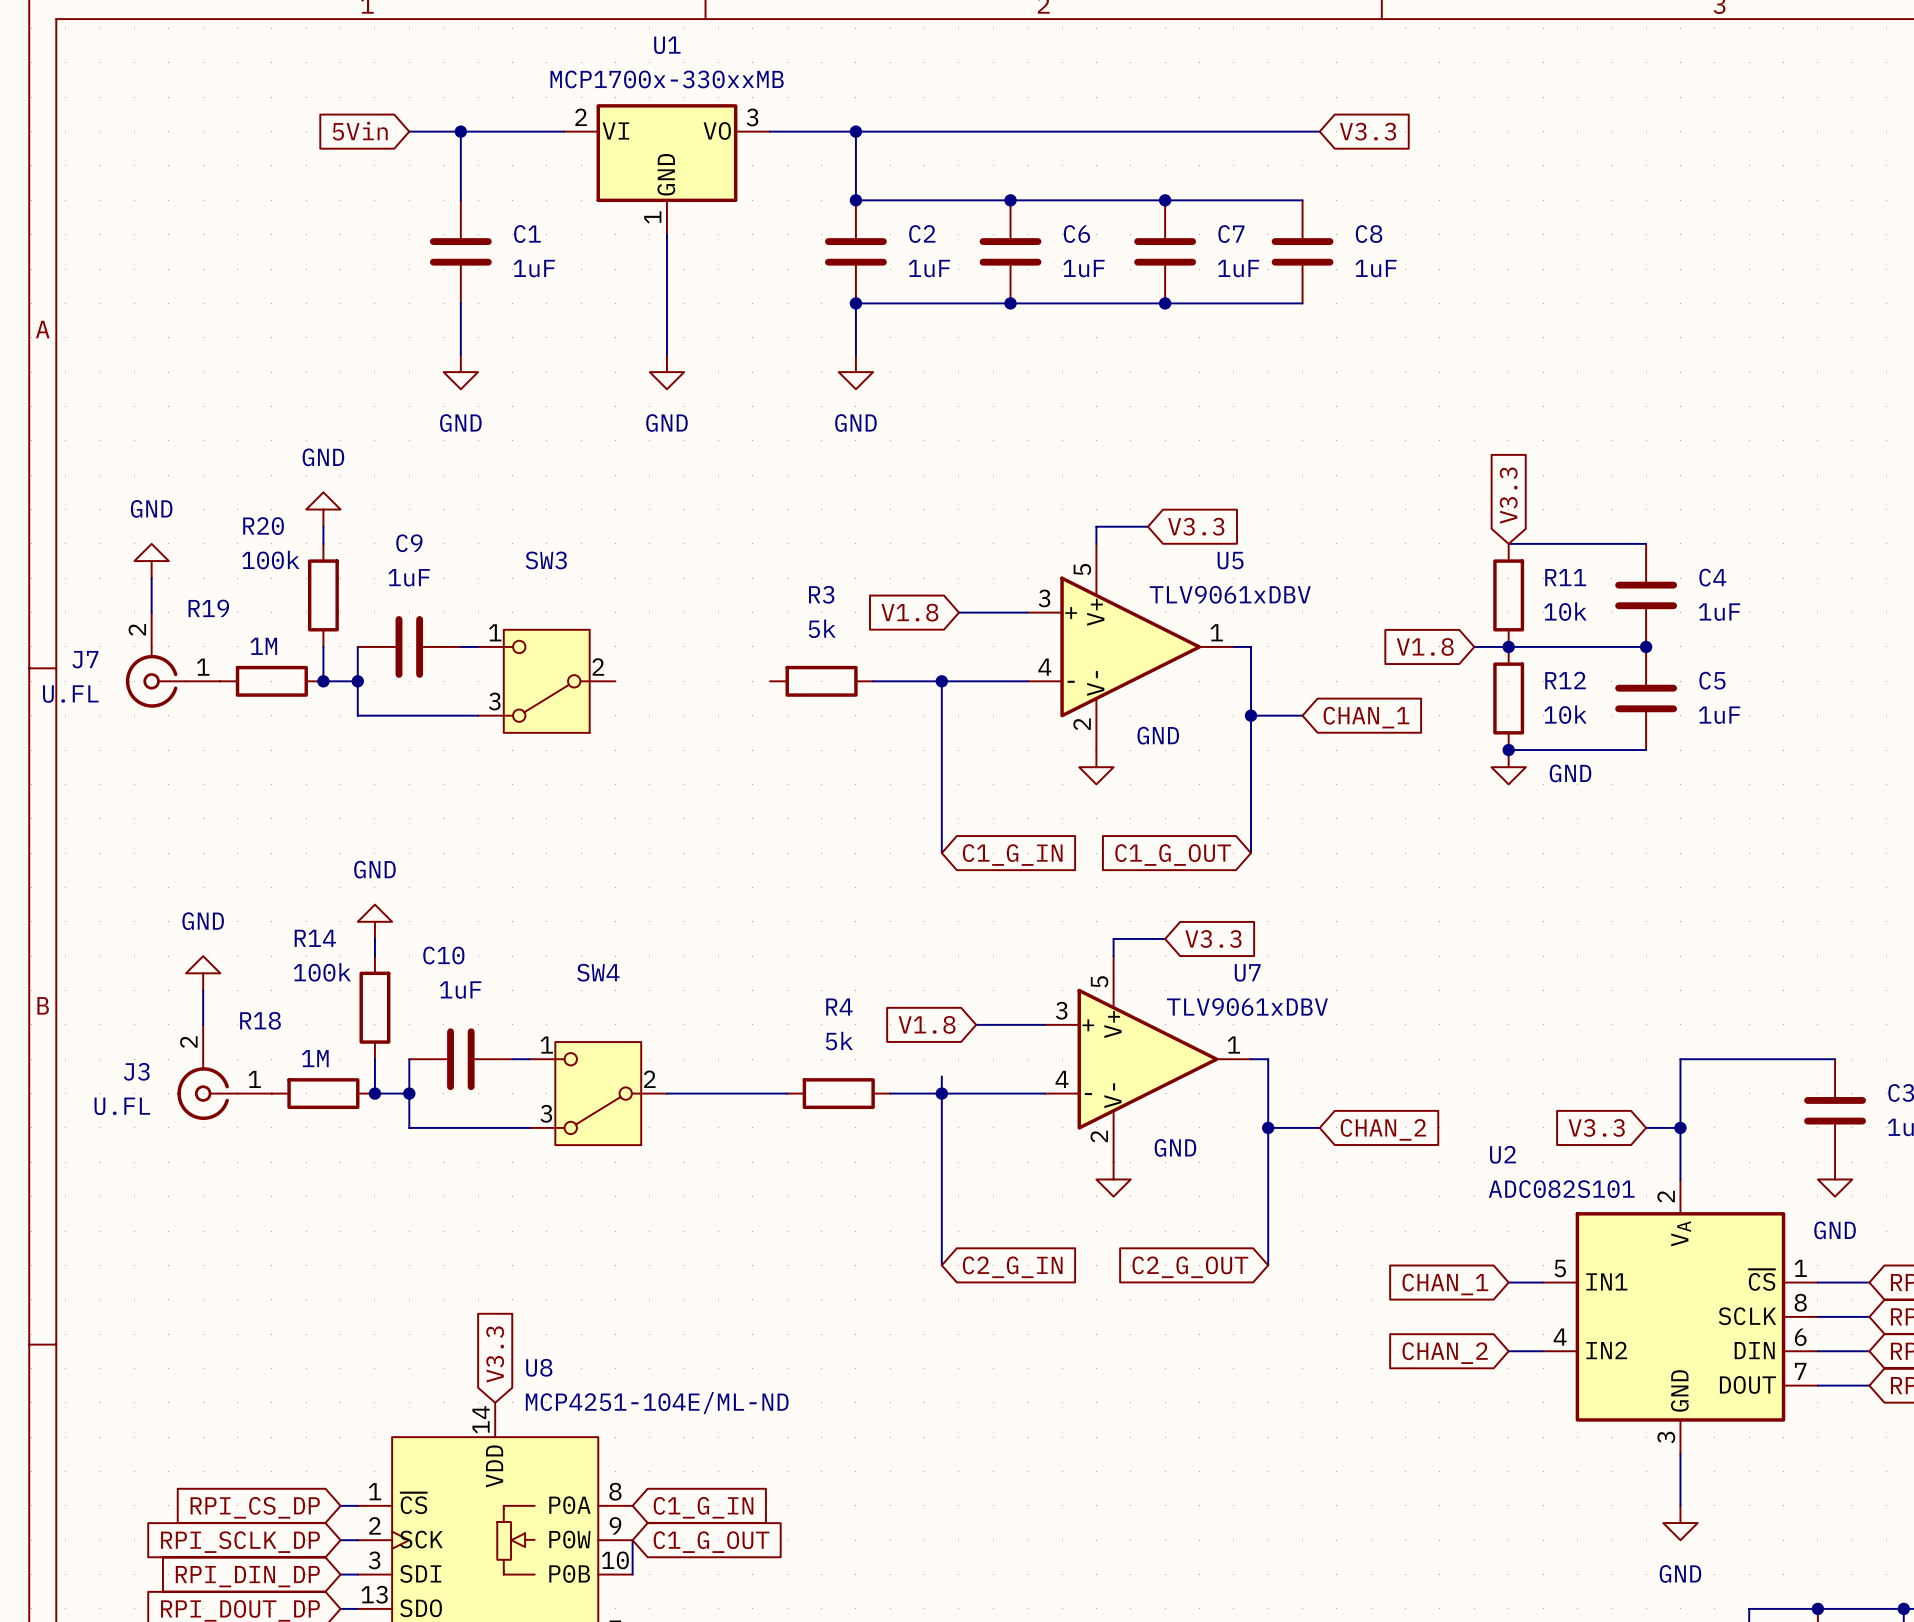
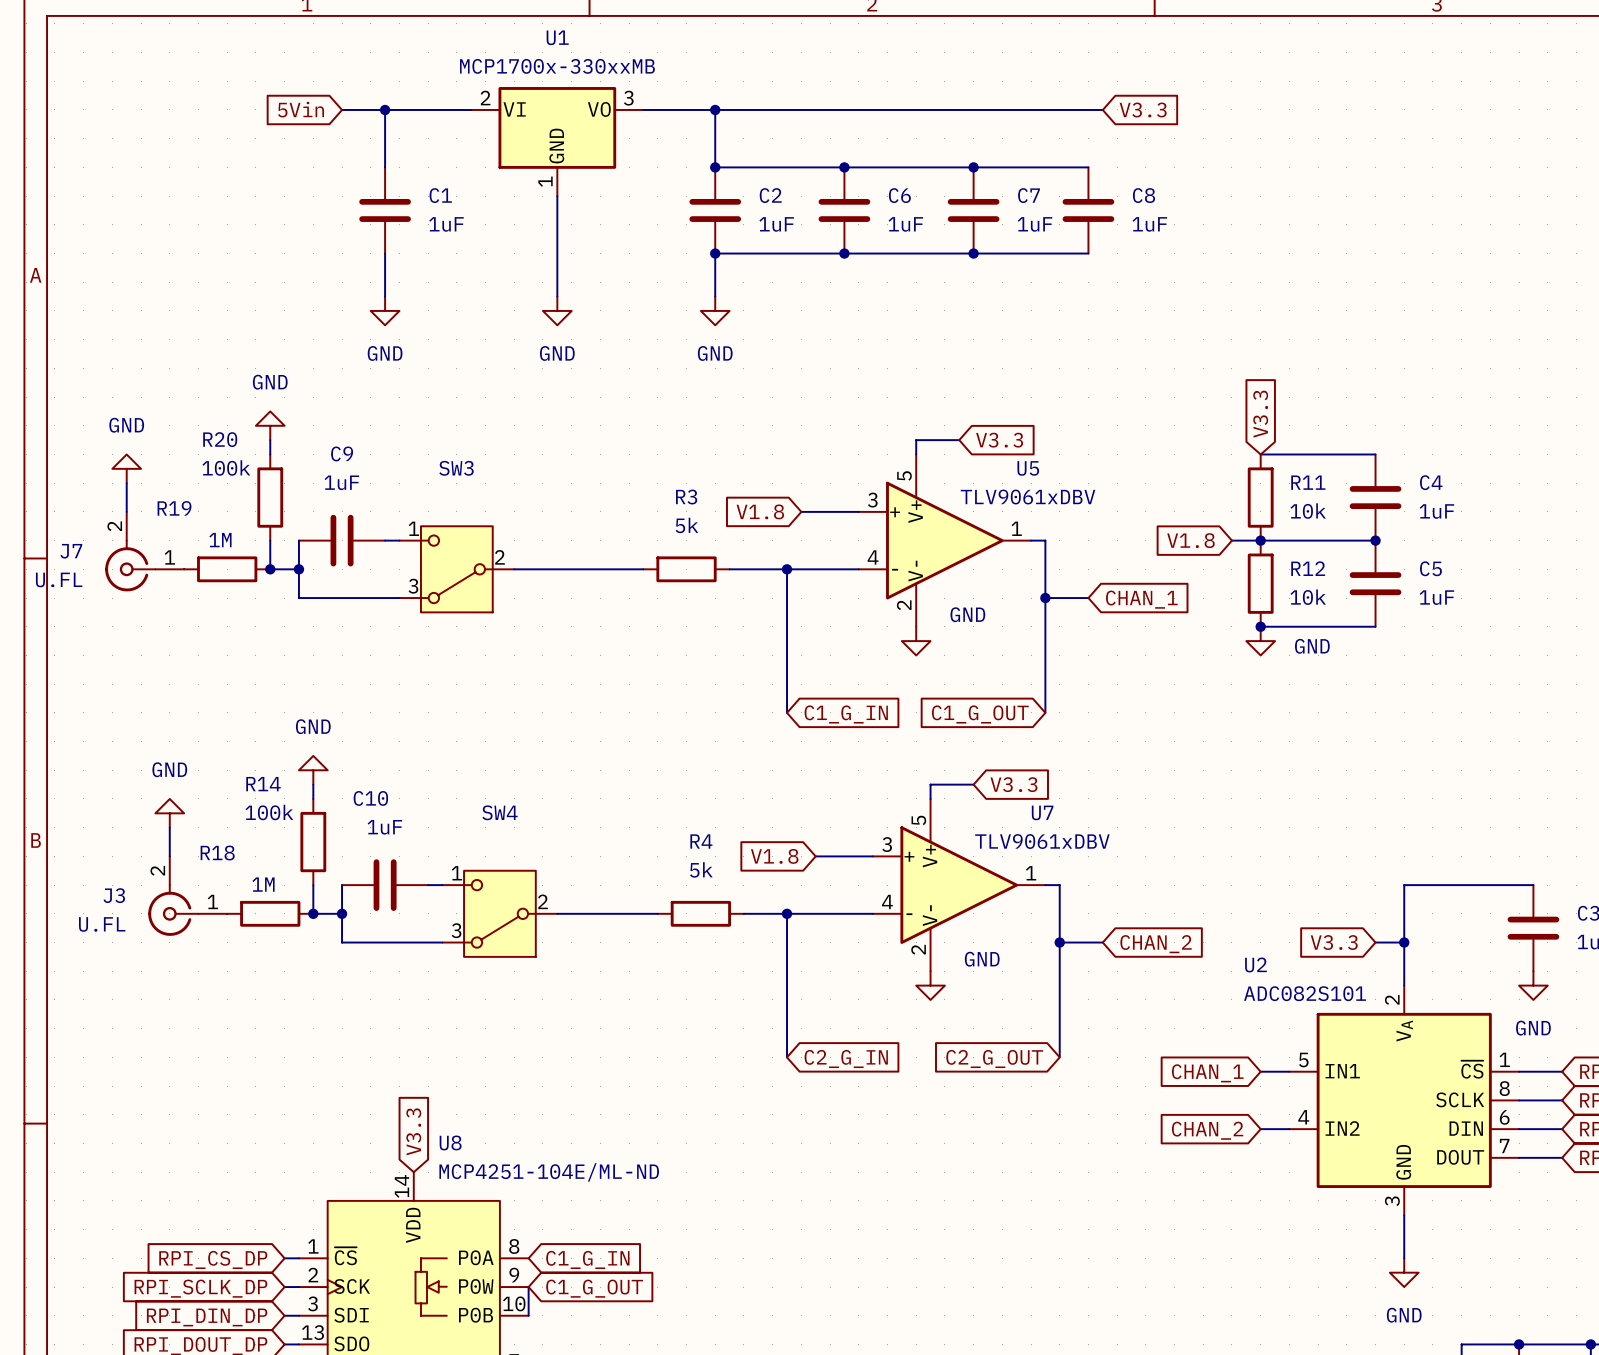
wire: none -> (514, 569) (643, 569)
wire: (941, 1076) (941, 1093) -> none

